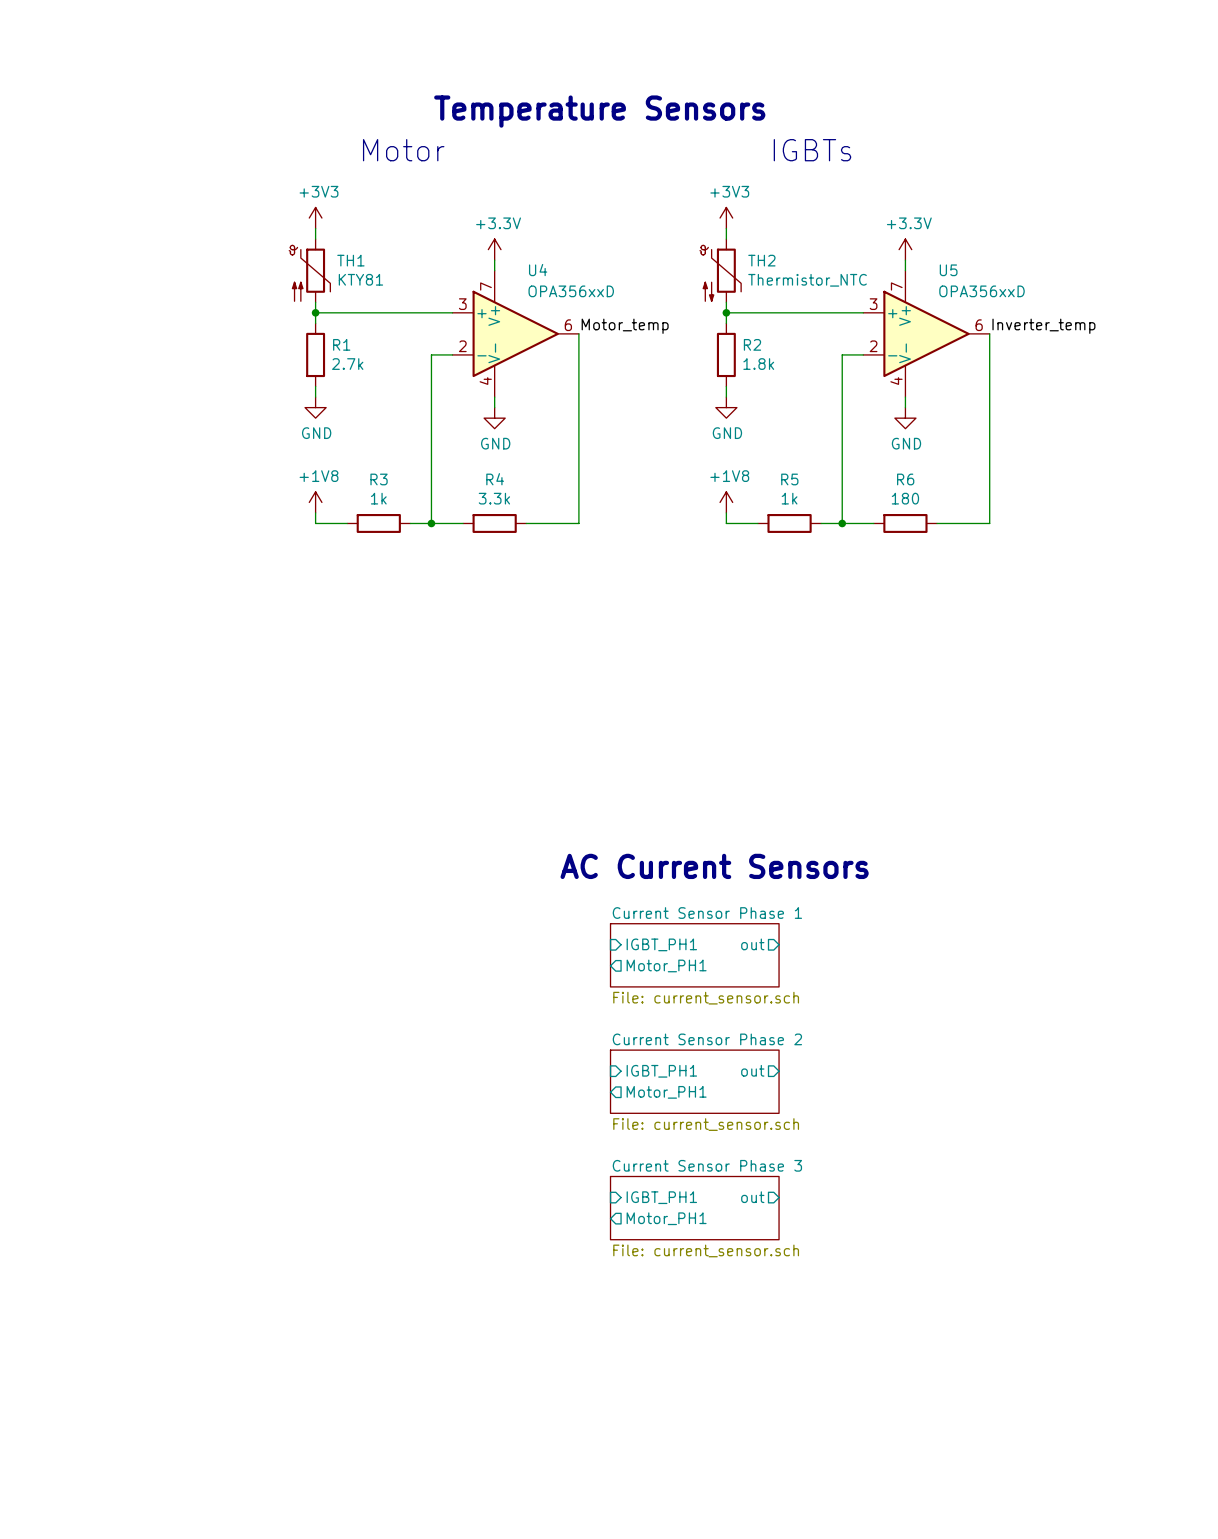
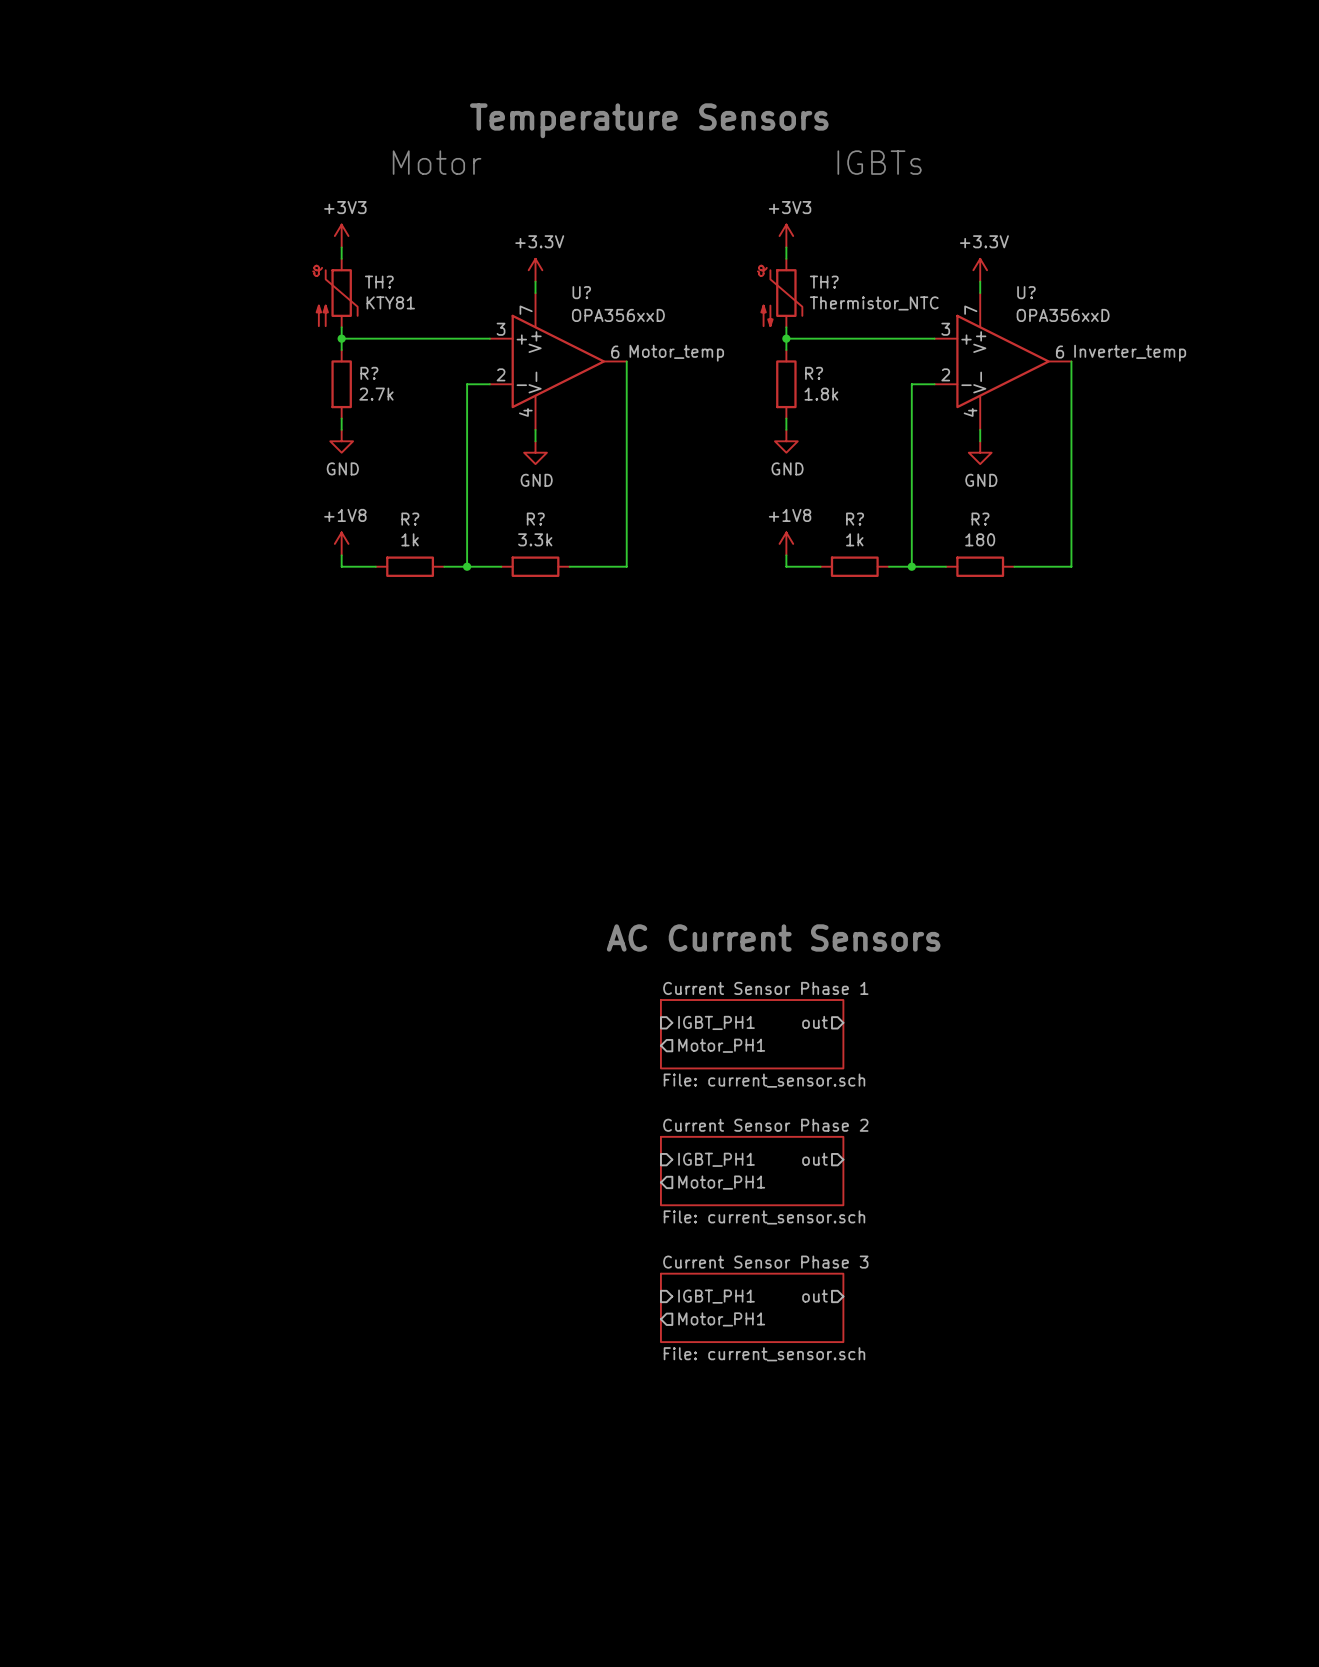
TH1 name: TH1 (350, 260) -> TH? (379, 282)
TH2 name: TH2 (761, 260) -> TH? (824, 282)
U4 name: U4 (538, 270) -> U? (581, 292)
U5 name: U5 (948, 270) -> U? (1026, 292)
R1 name: R1 (341, 344) -> R? (369, 373)
R2 name: R2 (752, 344) -> R? (814, 373)
R3 name: R3 (379, 479) -> R? (410, 519)
R4 name: R4 (495, 479) -> R? (535, 519)
R5 name: R5 (789, 479) -> R? (855, 519)
R6 name: R6 (905, 479) -> R? (980, 519)

